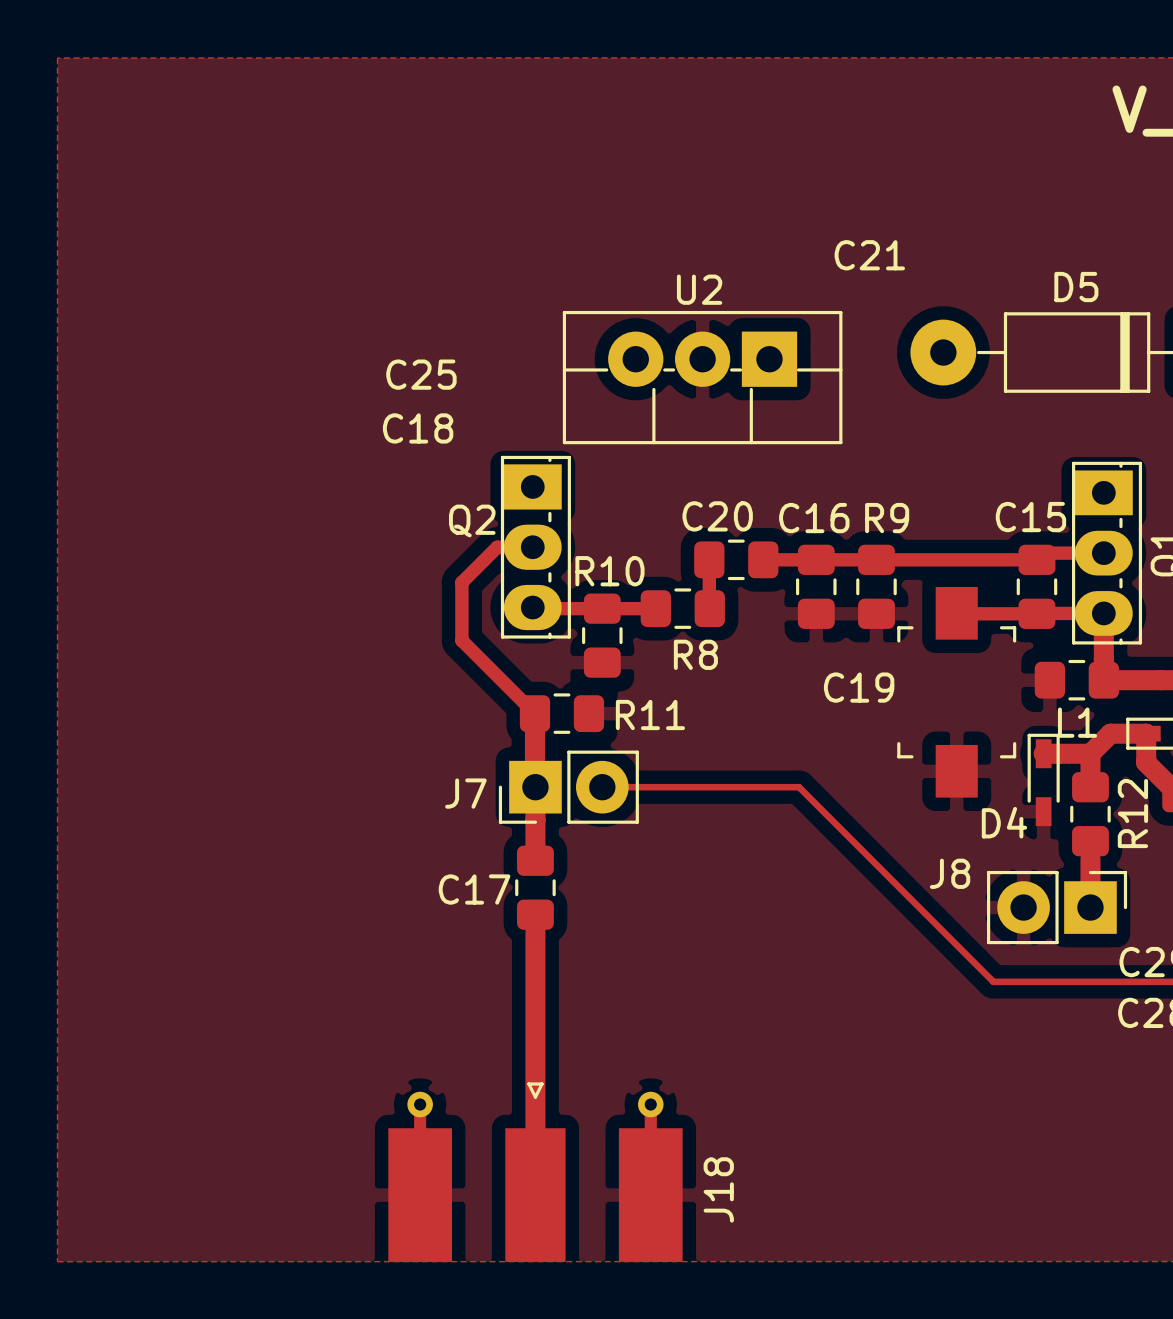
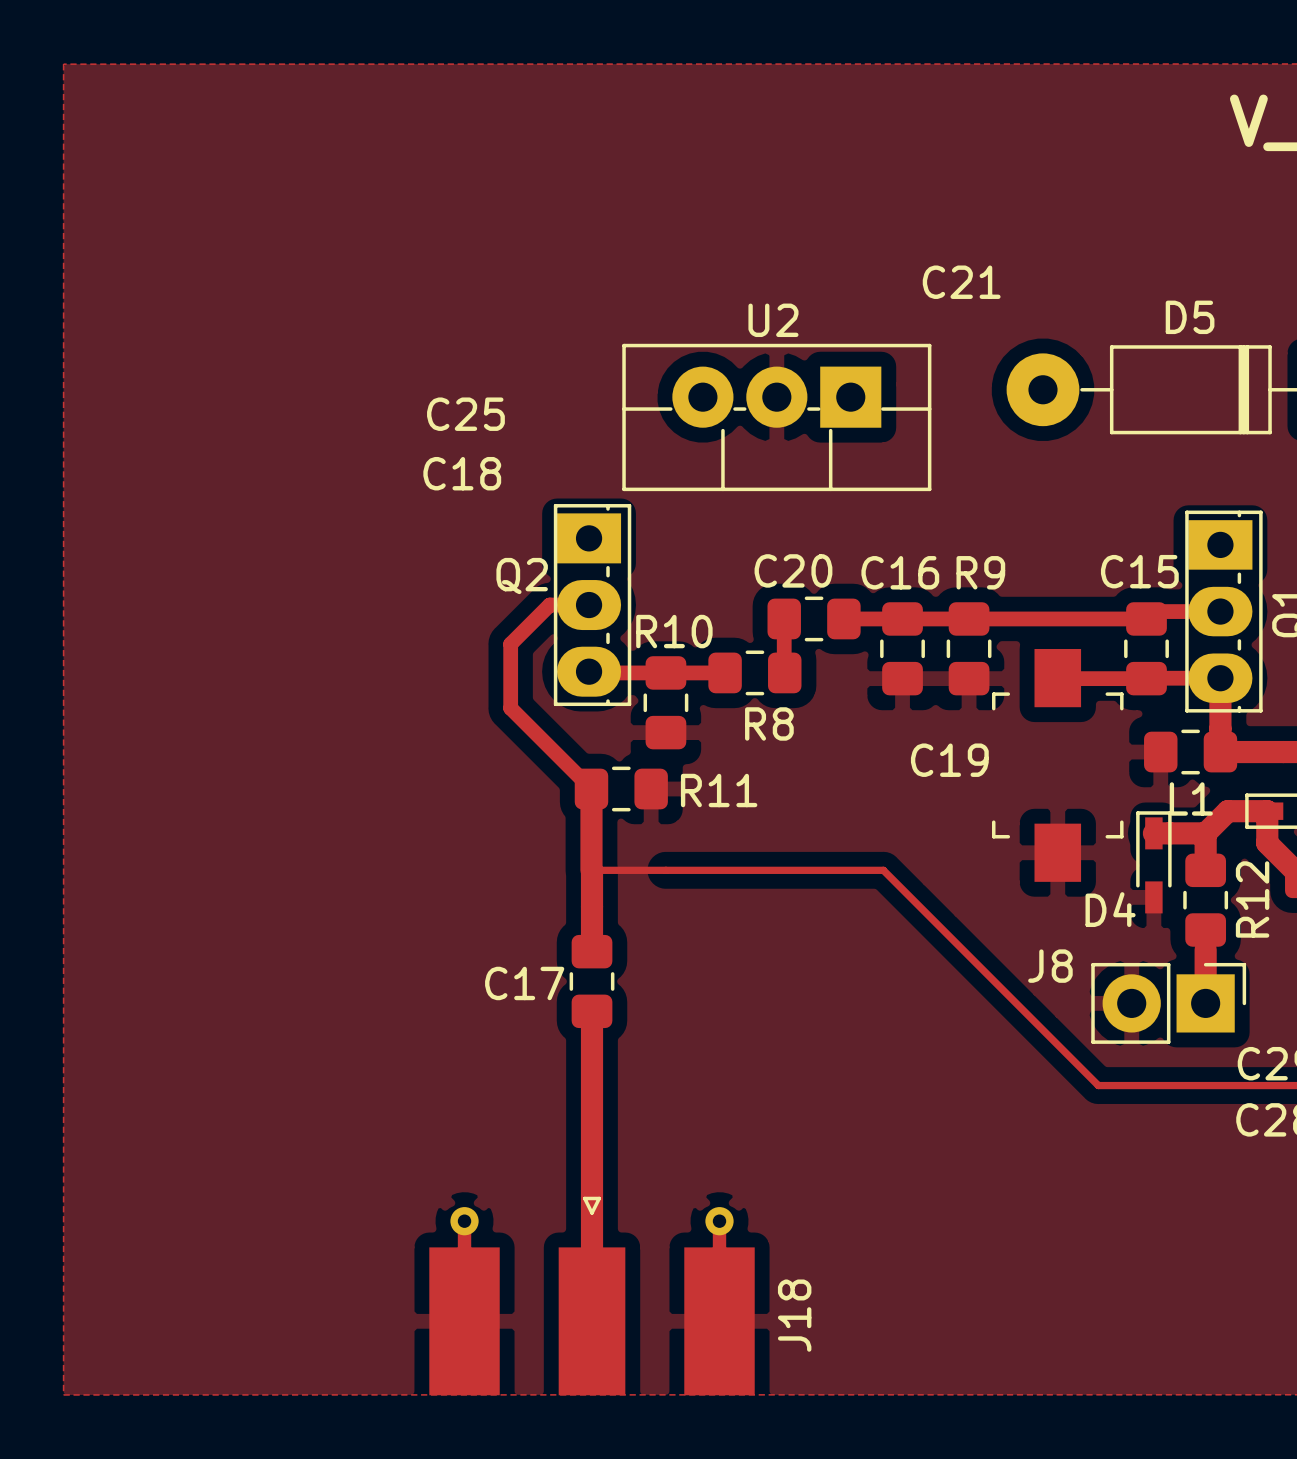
track: none -> (592, 870) (665, 870)
J7: (568, 787) -> none

